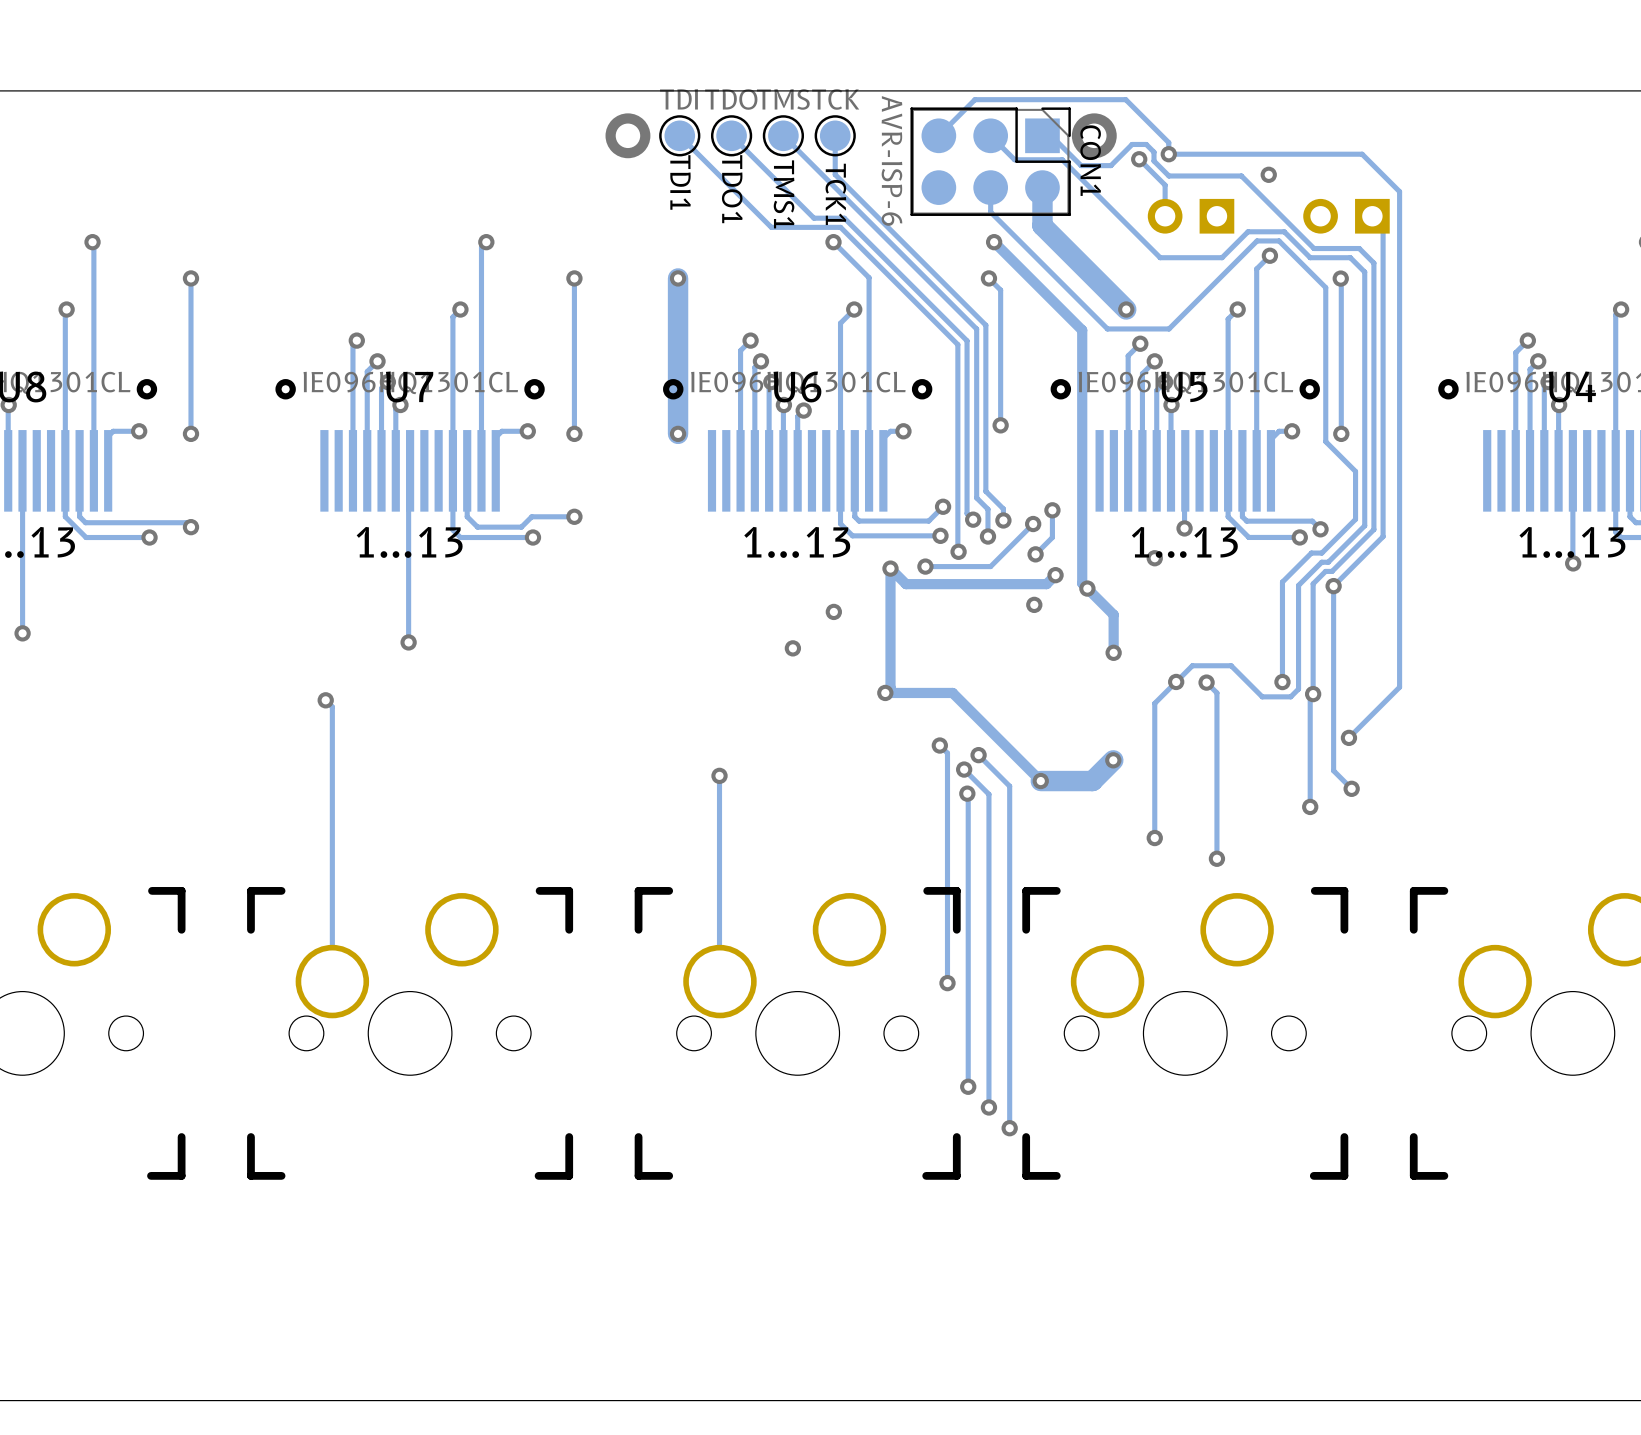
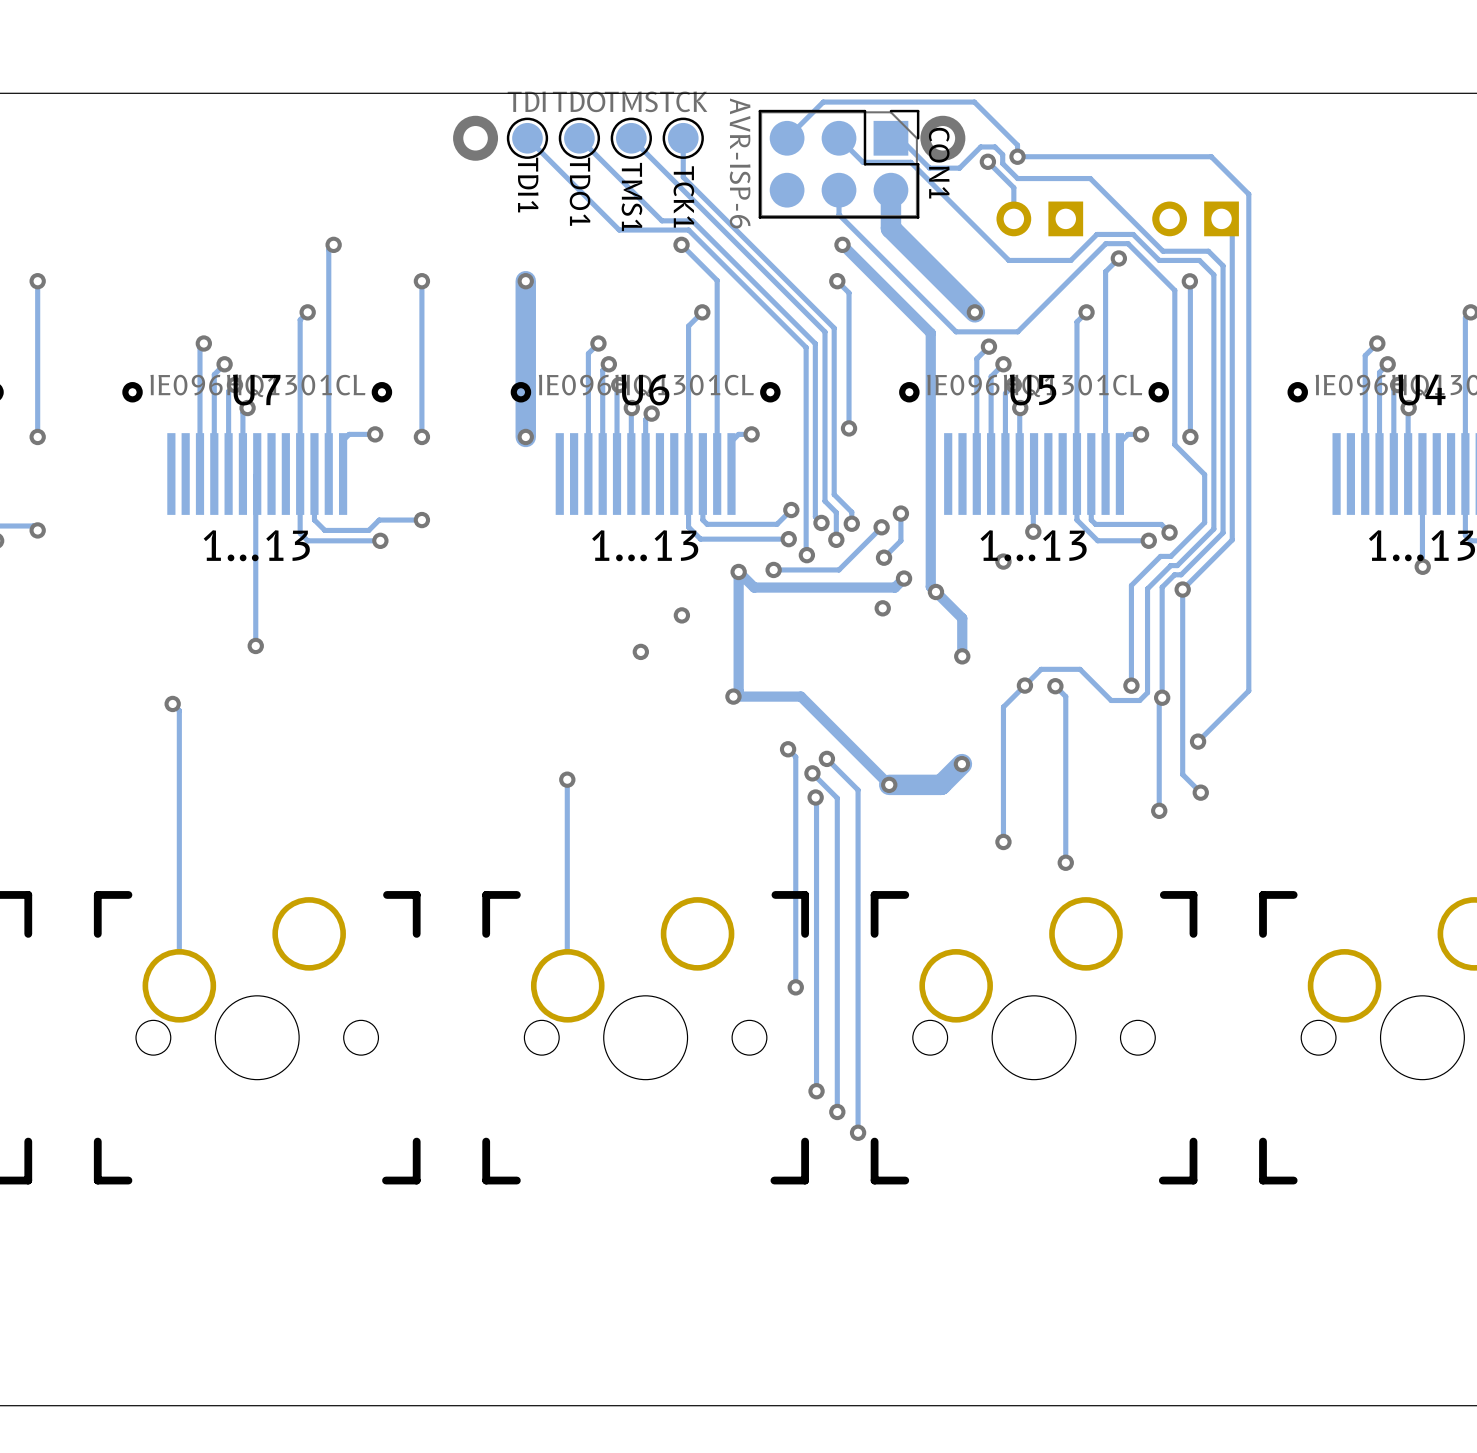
via: (1268, 174) -> none

